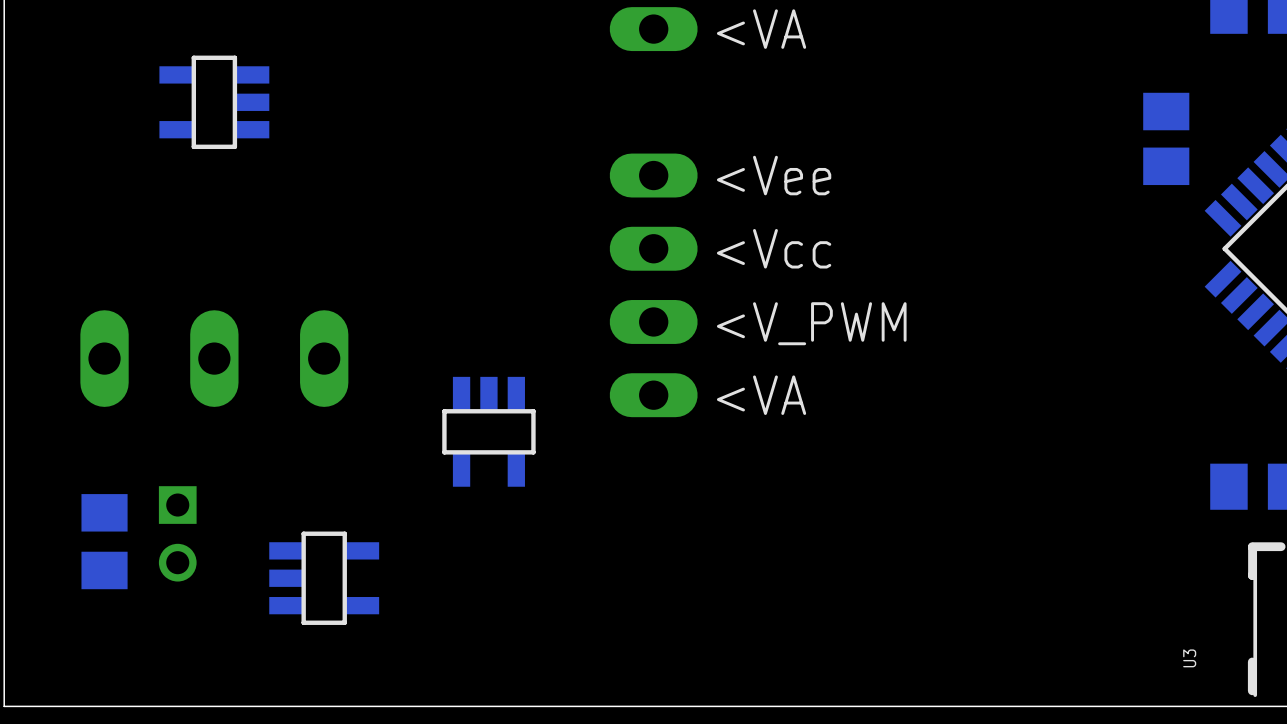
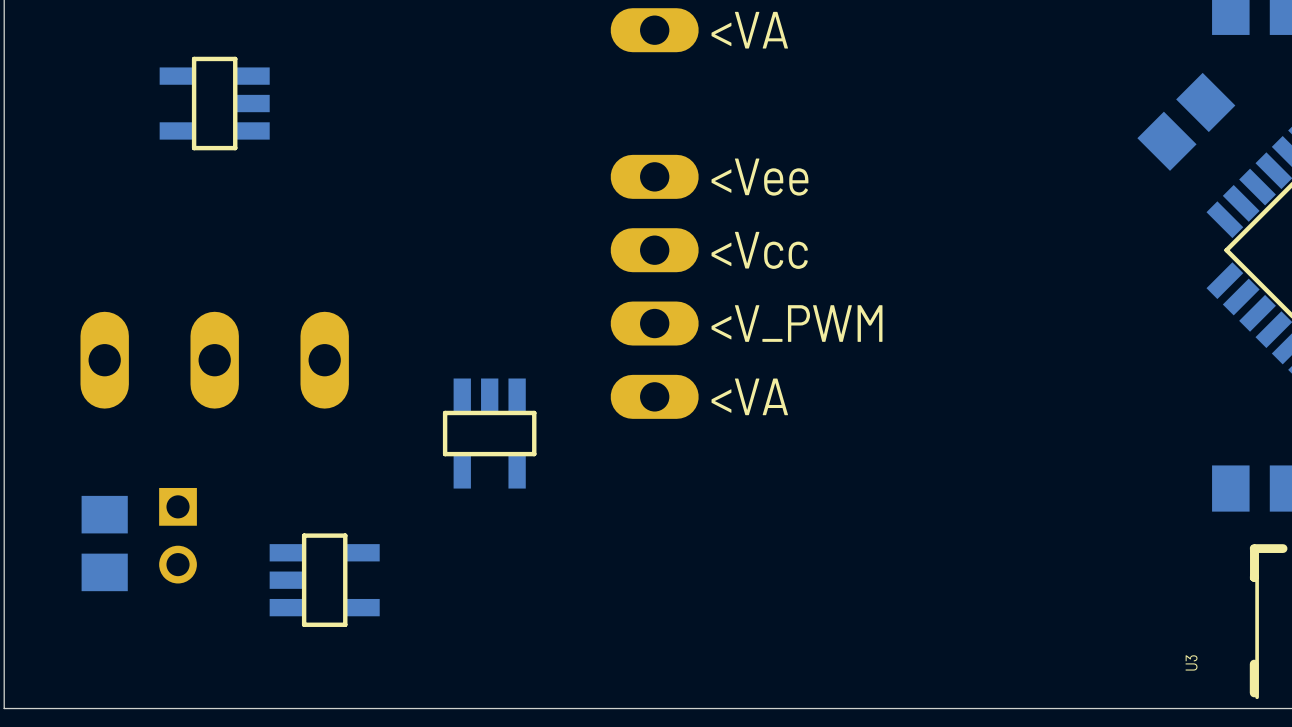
part rotation: 0° (1166, 138) -> 45° clockwise (1186, 121)

